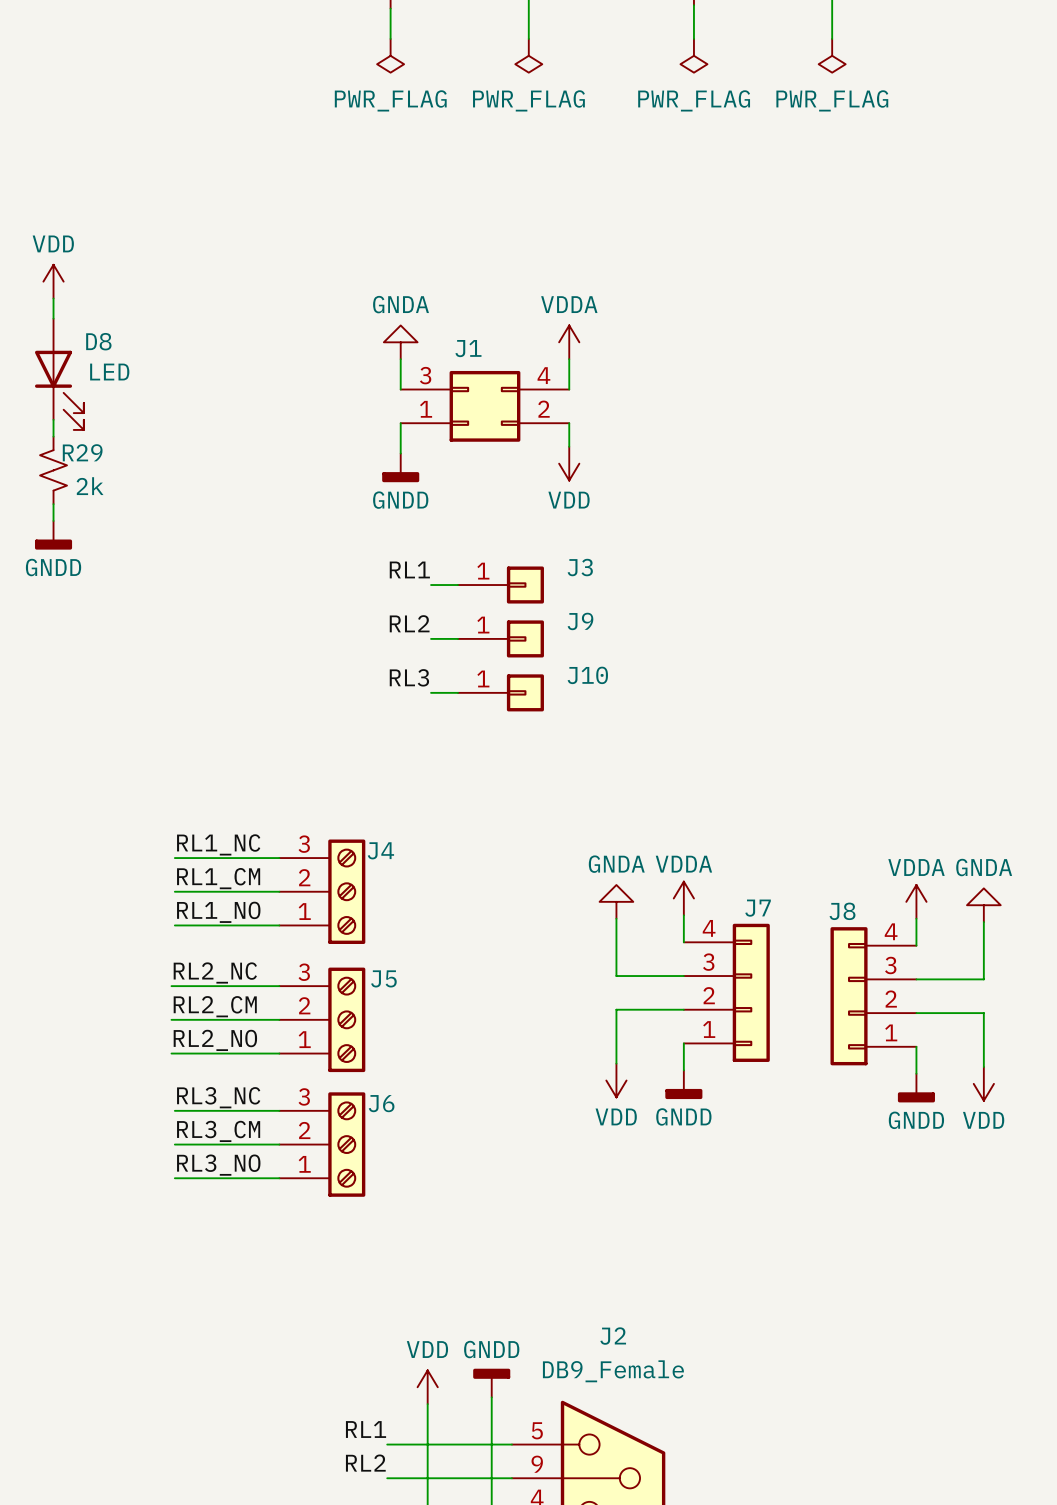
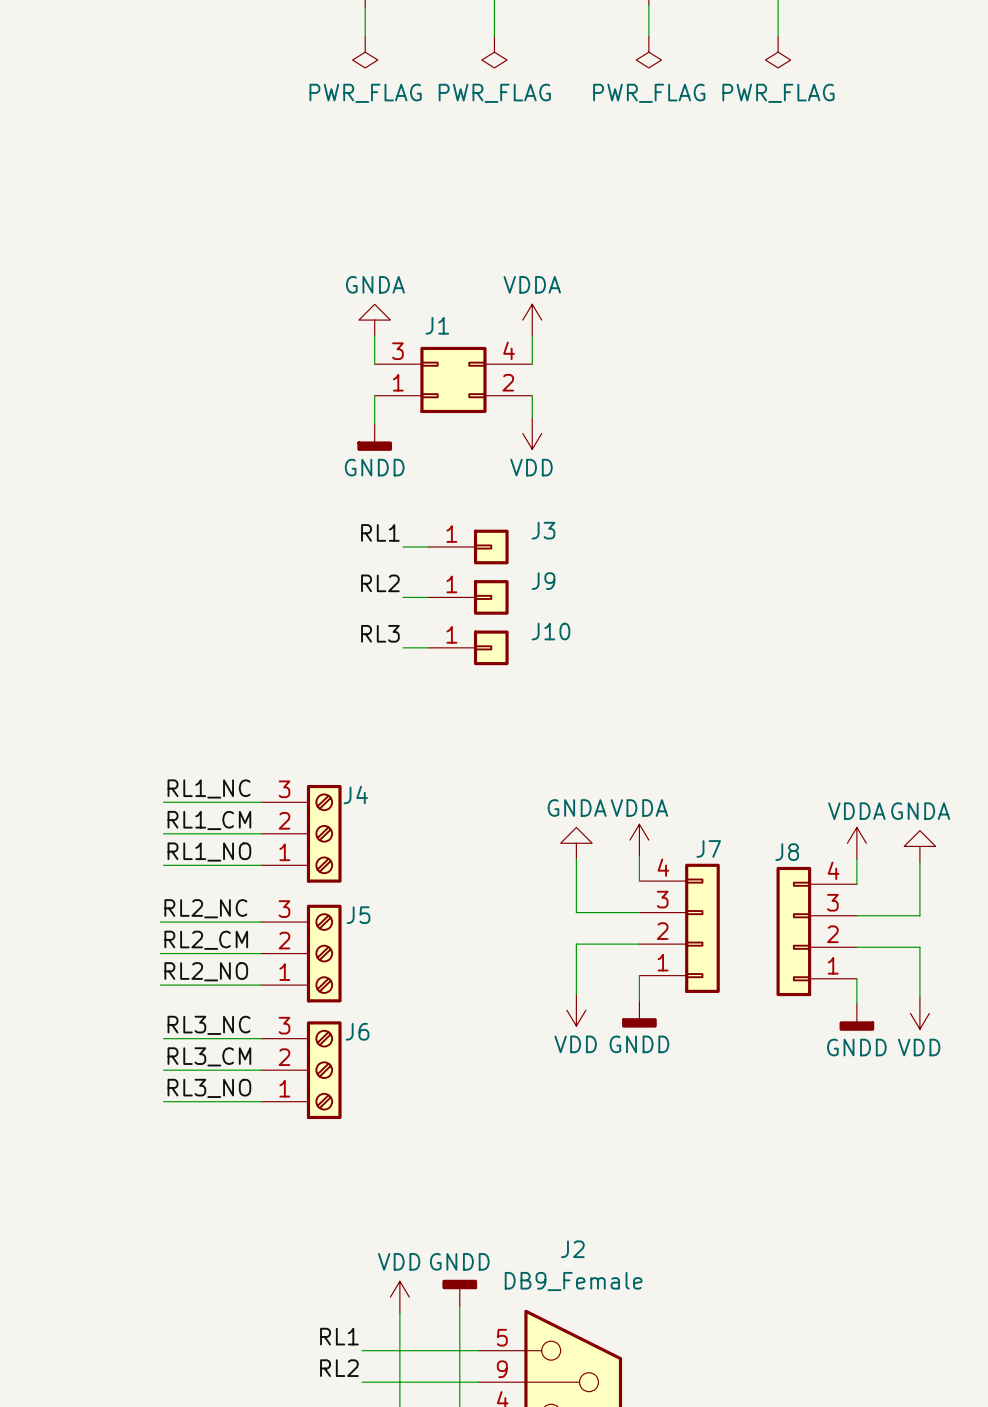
power symbol: VDD (53, 281) -> none
wire: (53, 298) (53, 318) -> none
D8: LED (59, 374) -> none
wire: (53, 419) (53, 436) -> none
R29: 2k (53, 470) -> none
wire: (53, 504) (53, 520) -> none
power symbol: GNDD (53, 535) -> none

